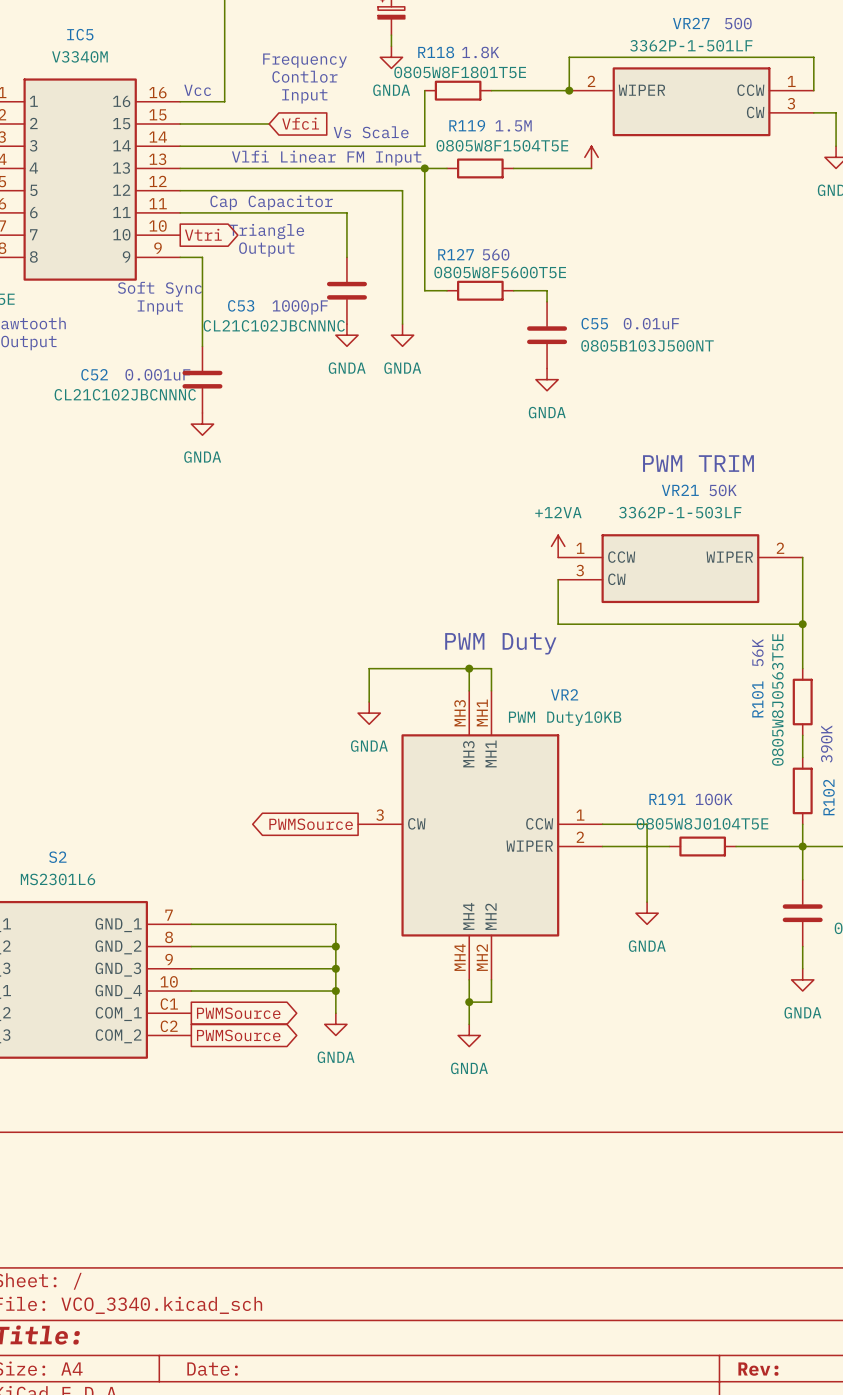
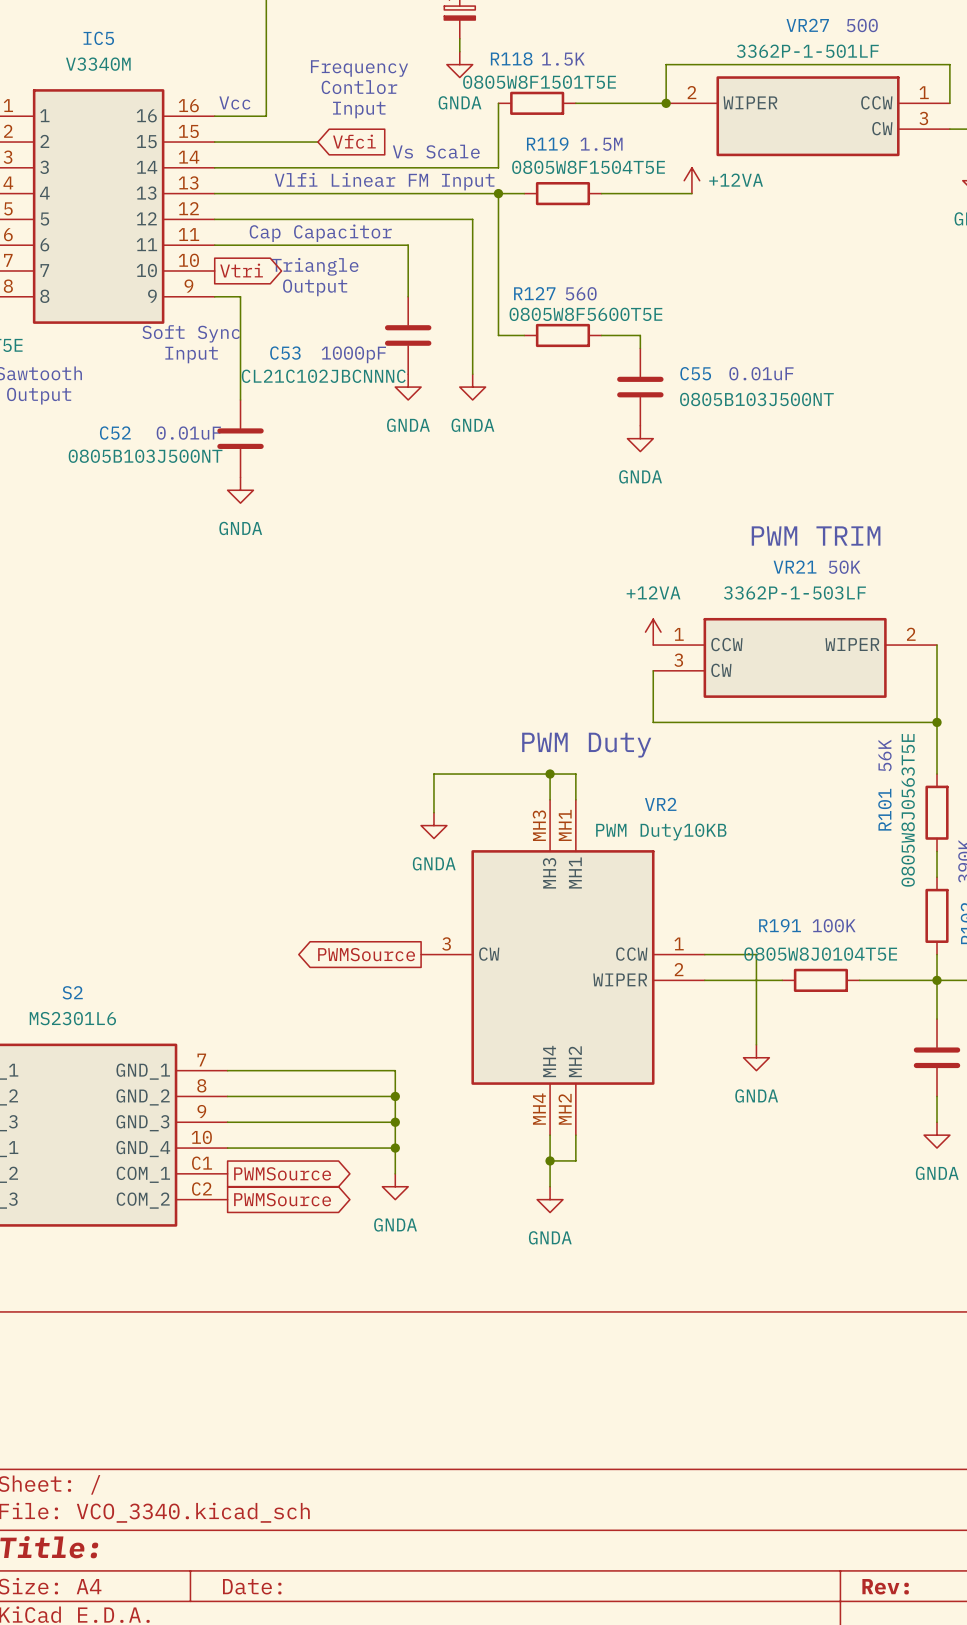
text: 1.8K (480, 52) -> 1.5K (563, 59)
R118 value: 0805W8F1801T5E (460, 72) -> 0805W8F1501T5E (539, 82)
power symbol text: none -> +12VA (736, 180)
text: 0.001uF (157, 374) -> 0.01uF (188, 433)
C52 value: CL21C102JBCNNNC (125, 394) -> 0805B103J500NT (145, 456)

